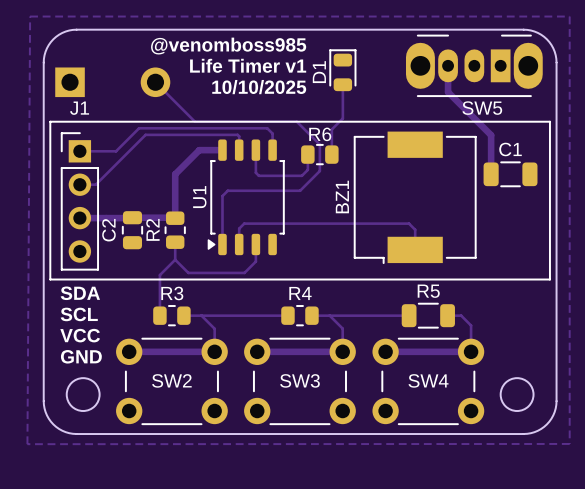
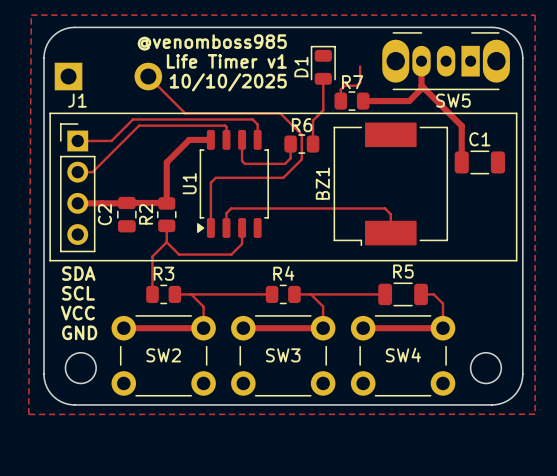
track: none -> (360, 66) (360, 82) (357, 85) (344, 85) (340, 89) (340, 101)
track: none -> (423, 87) (409, 101) (363, 101)
R7: none -> (351, 101)

